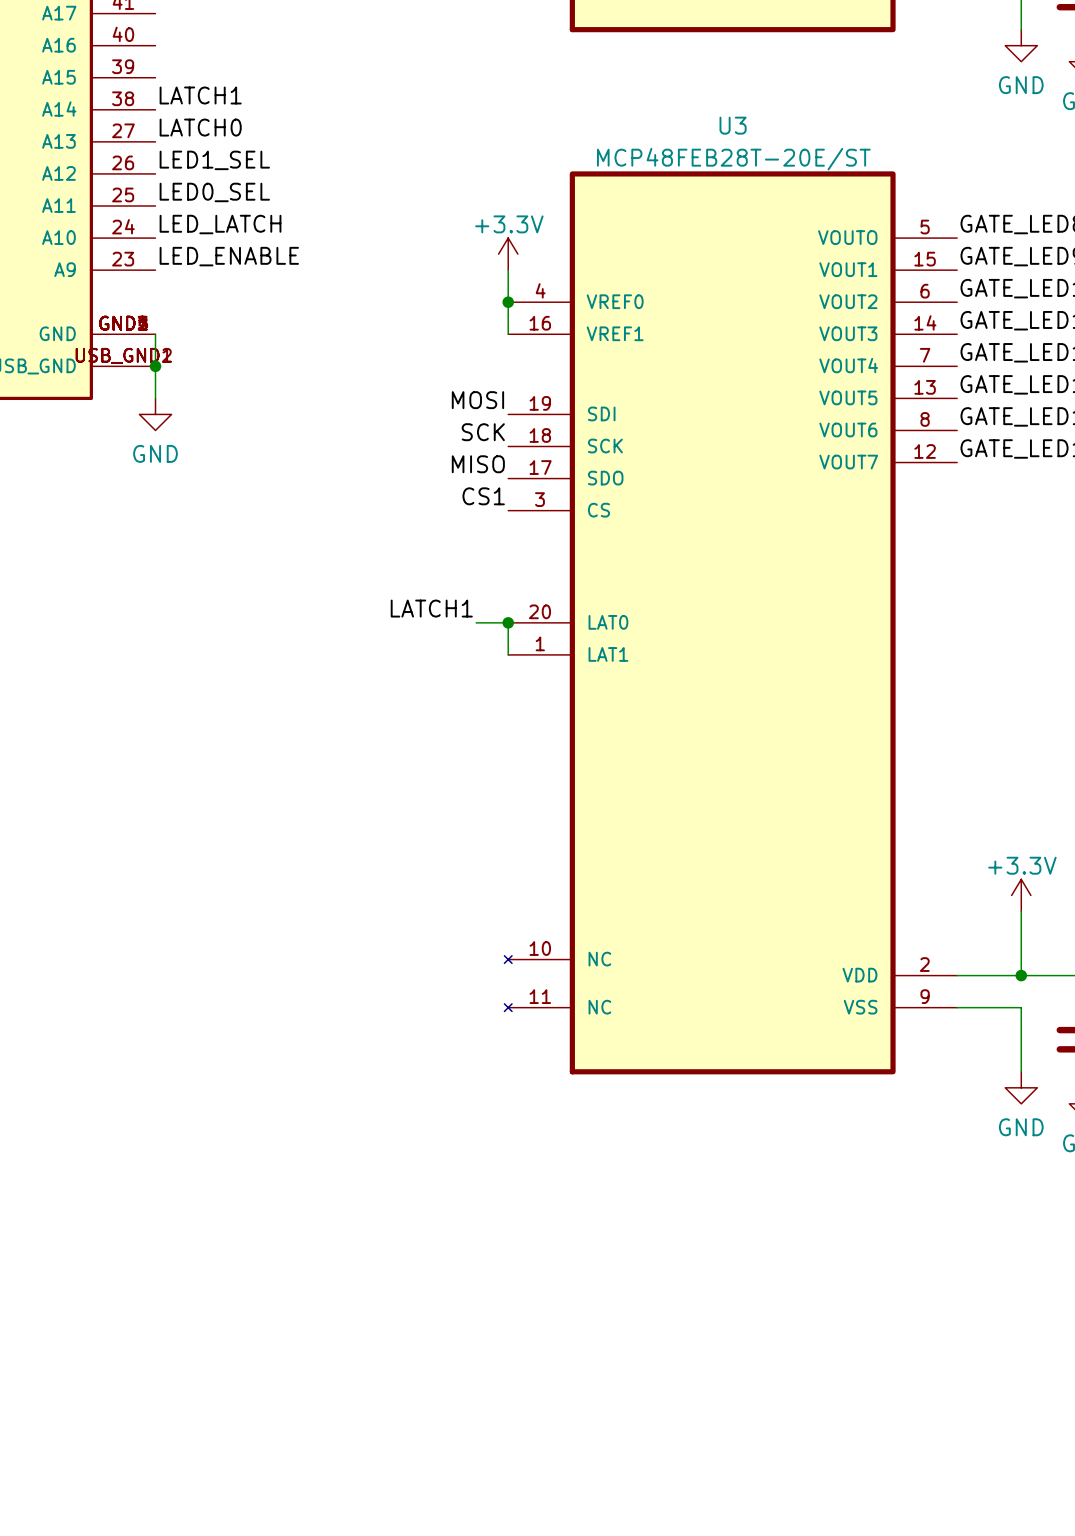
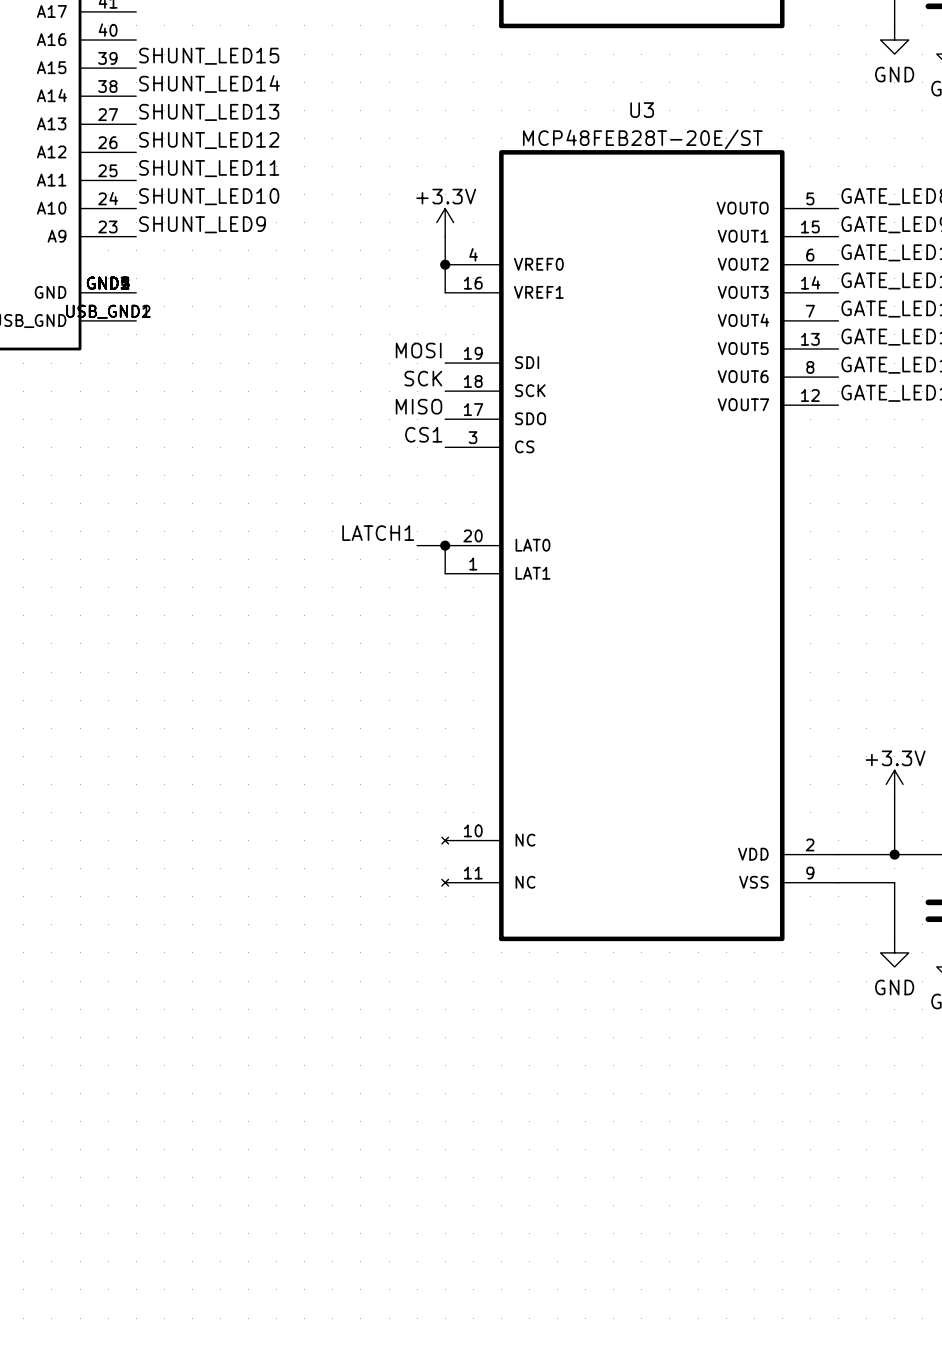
label: none -> SHUNT_LED15 (209, 56)
label: LATCH1 (200, 95) -> SHUNT_LED14 (209, 83)
label: LATCH0 (200, 127) -> SHUNT_LED13 (209, 112)
label: LED1_SEL (214, 160) -> SHUNT_LED12 (209, 140)
label: LED0_SEL (214, 192) -> SHUNT_LED11 (209, 168)
label: LED_LATCH (220, 224) -> SHUNT_LED10 (209, 196)
label: LED_ENABLE (229, 256) -> SHUNT_LED9 (202, 224)
wire: (155, 334) (155, 398) -> none
junction: (155, 366) -> none
power symbol: GND (155, 414) -> none

